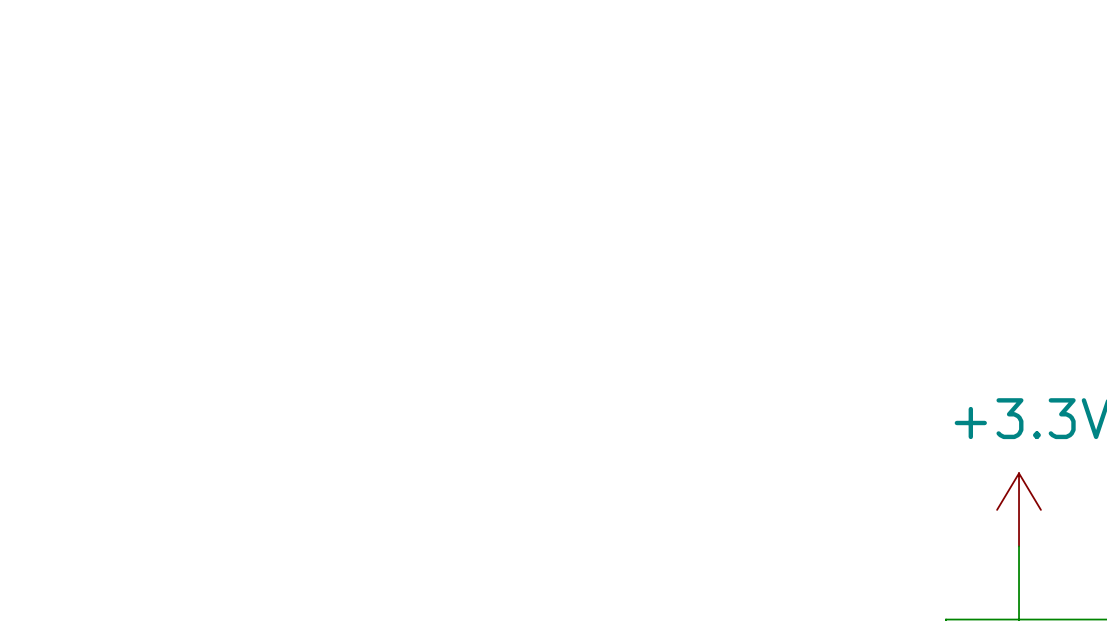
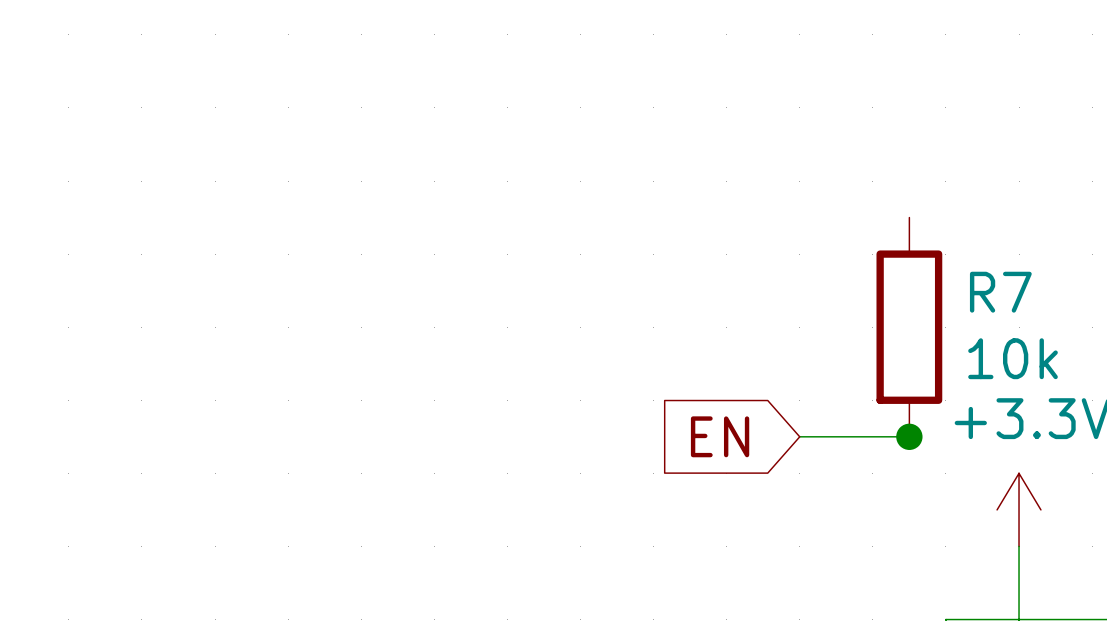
R7: none -> 10k (909, 327)
global label: none -> EN (720, 436)
wire: none -> (799, 436) (909, 436)
junction: none -> (909, 436)

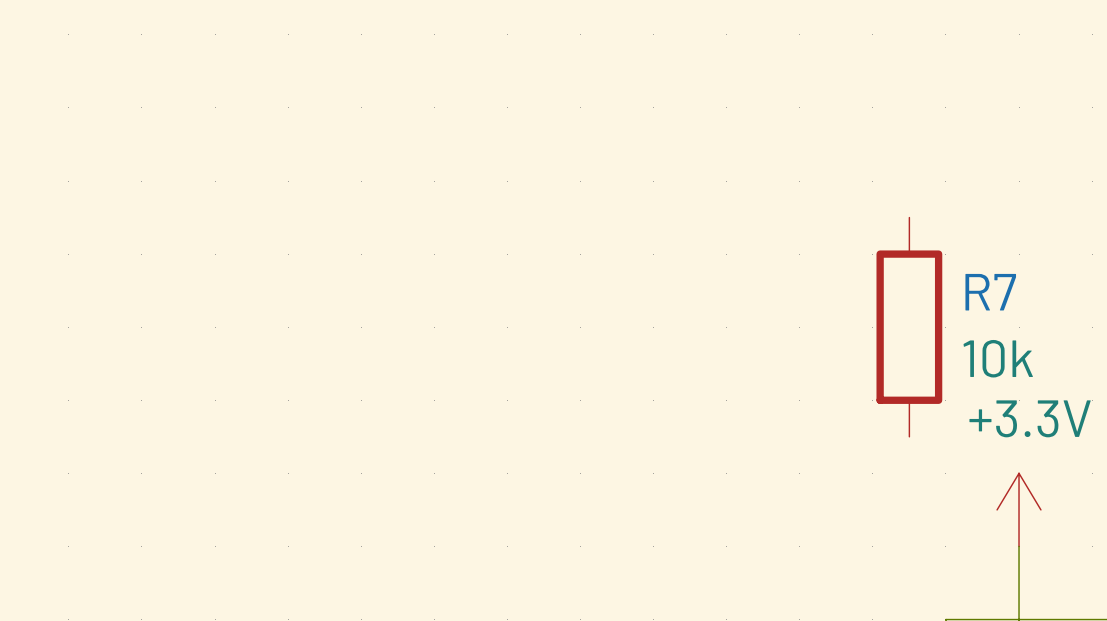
global label: EN (720, 436) -> none
wire: (799, 436) (909, 436) -> none
junction: (909, 436) -> none

